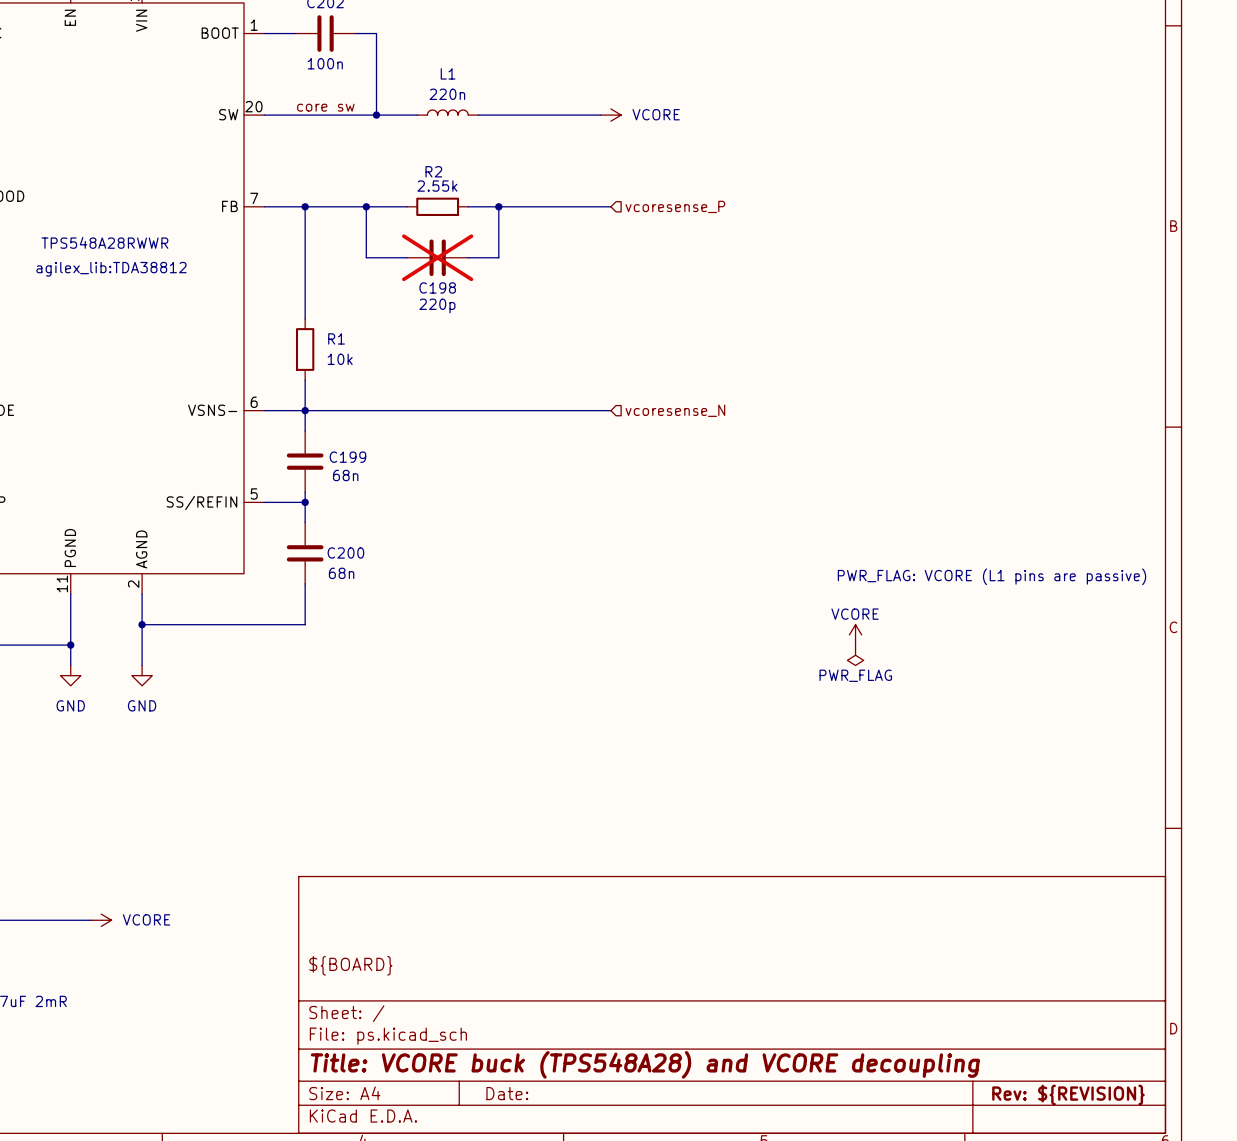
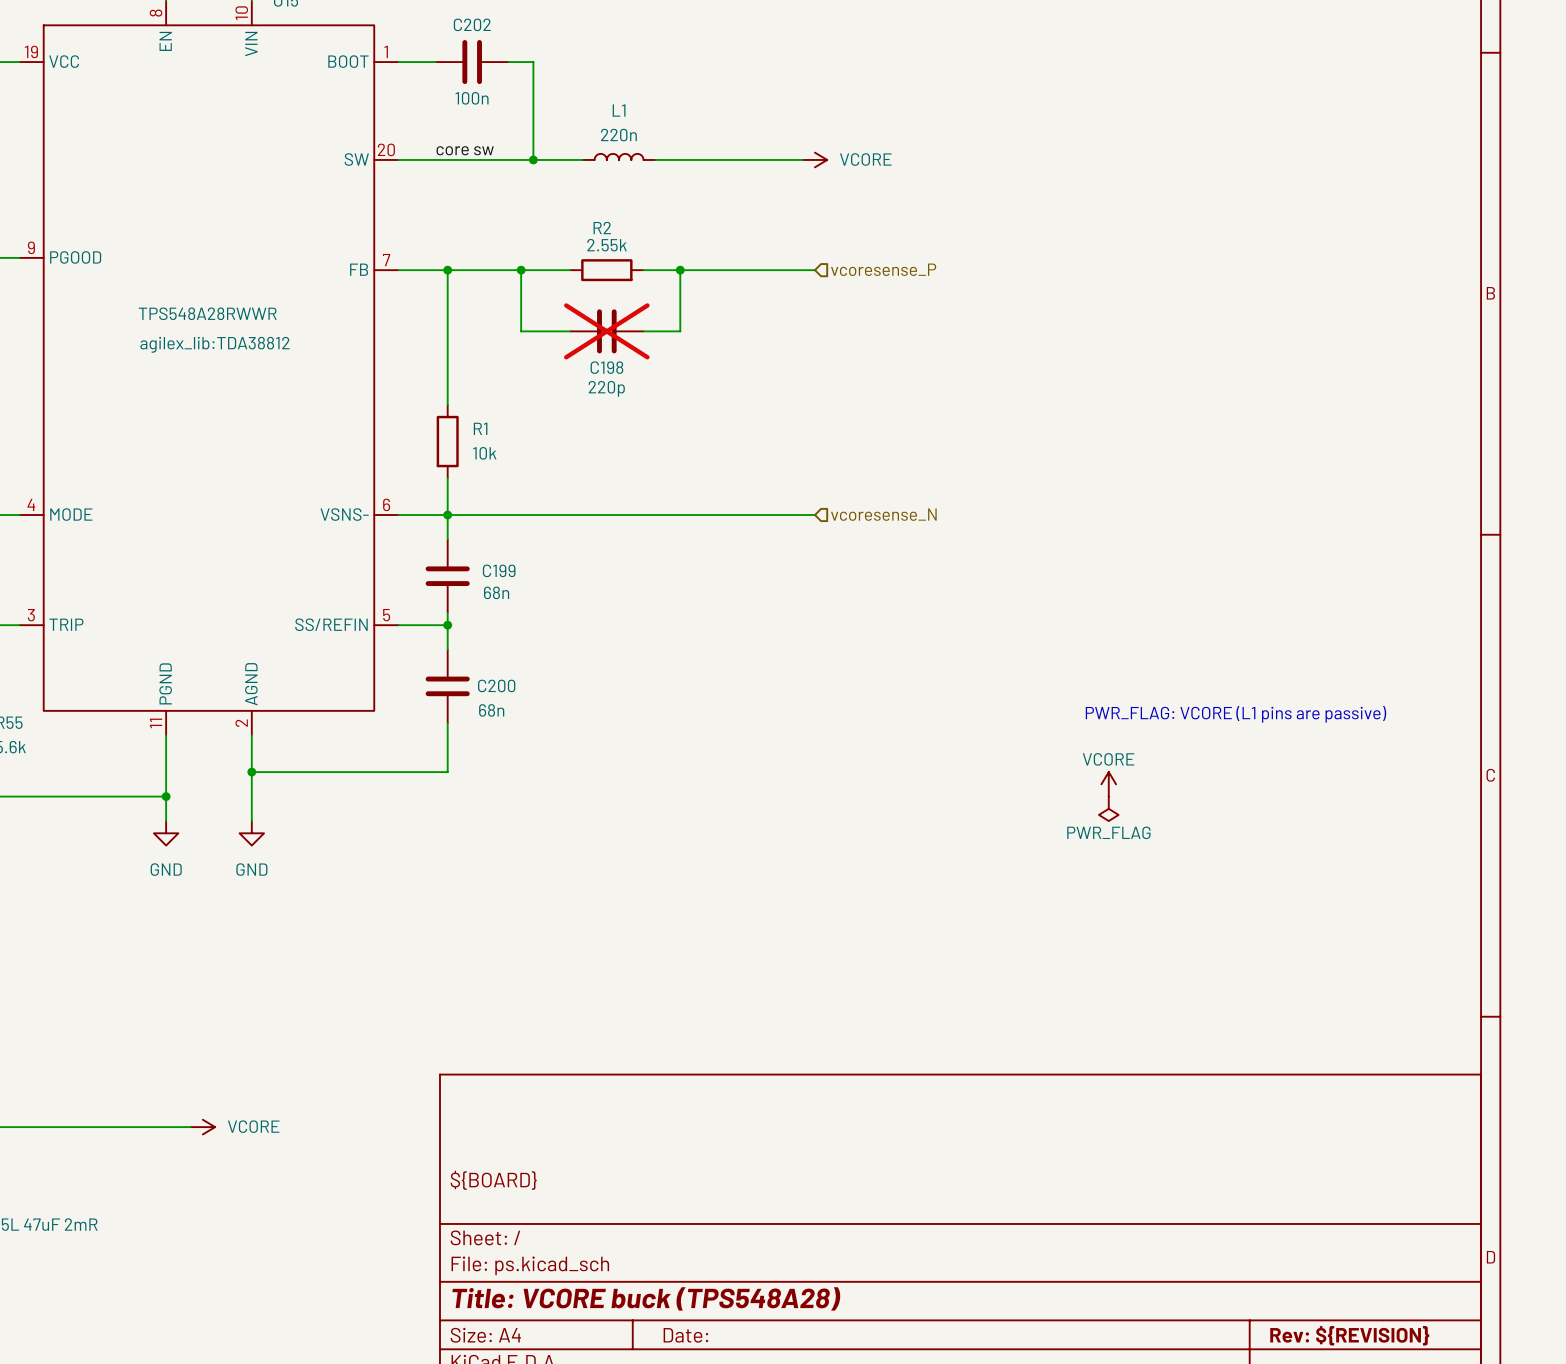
title block: Title: VCORE buck (TPS548A28) and VCORE decoupling (645, 1064) -> Title: VCORE buck (TPS548A28) (646, 1298)

